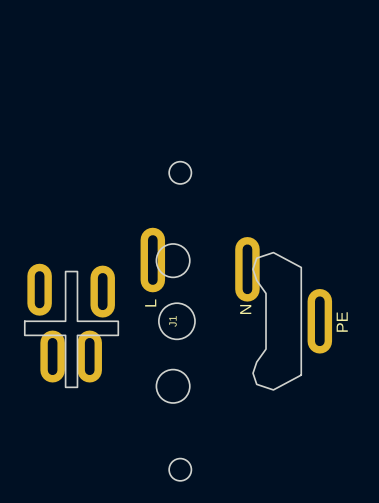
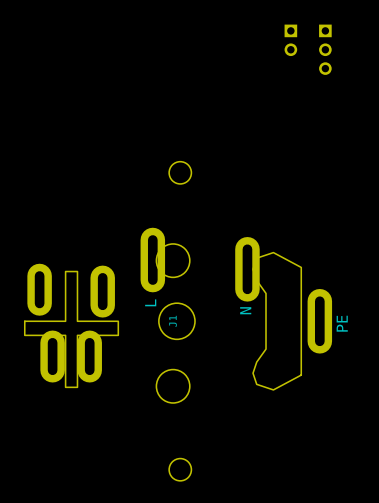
part: none -> (290, 40)
part: none -> (325, 49)

